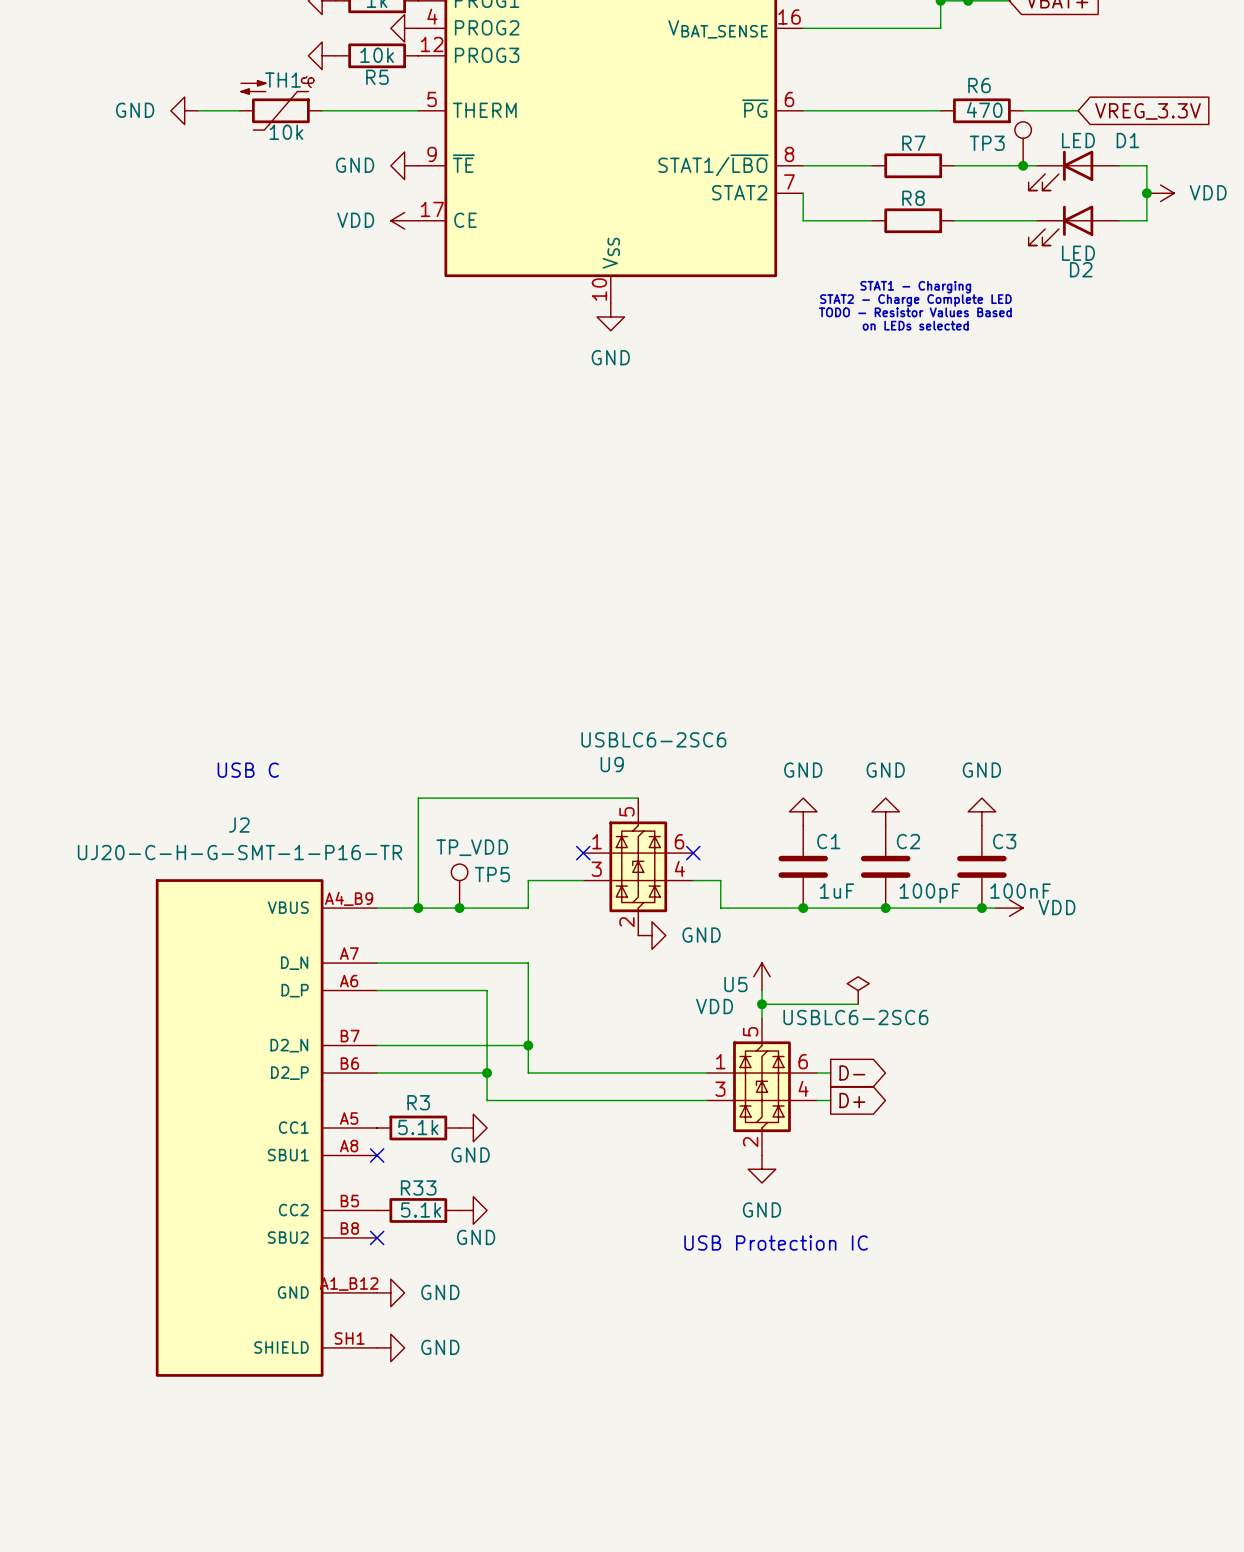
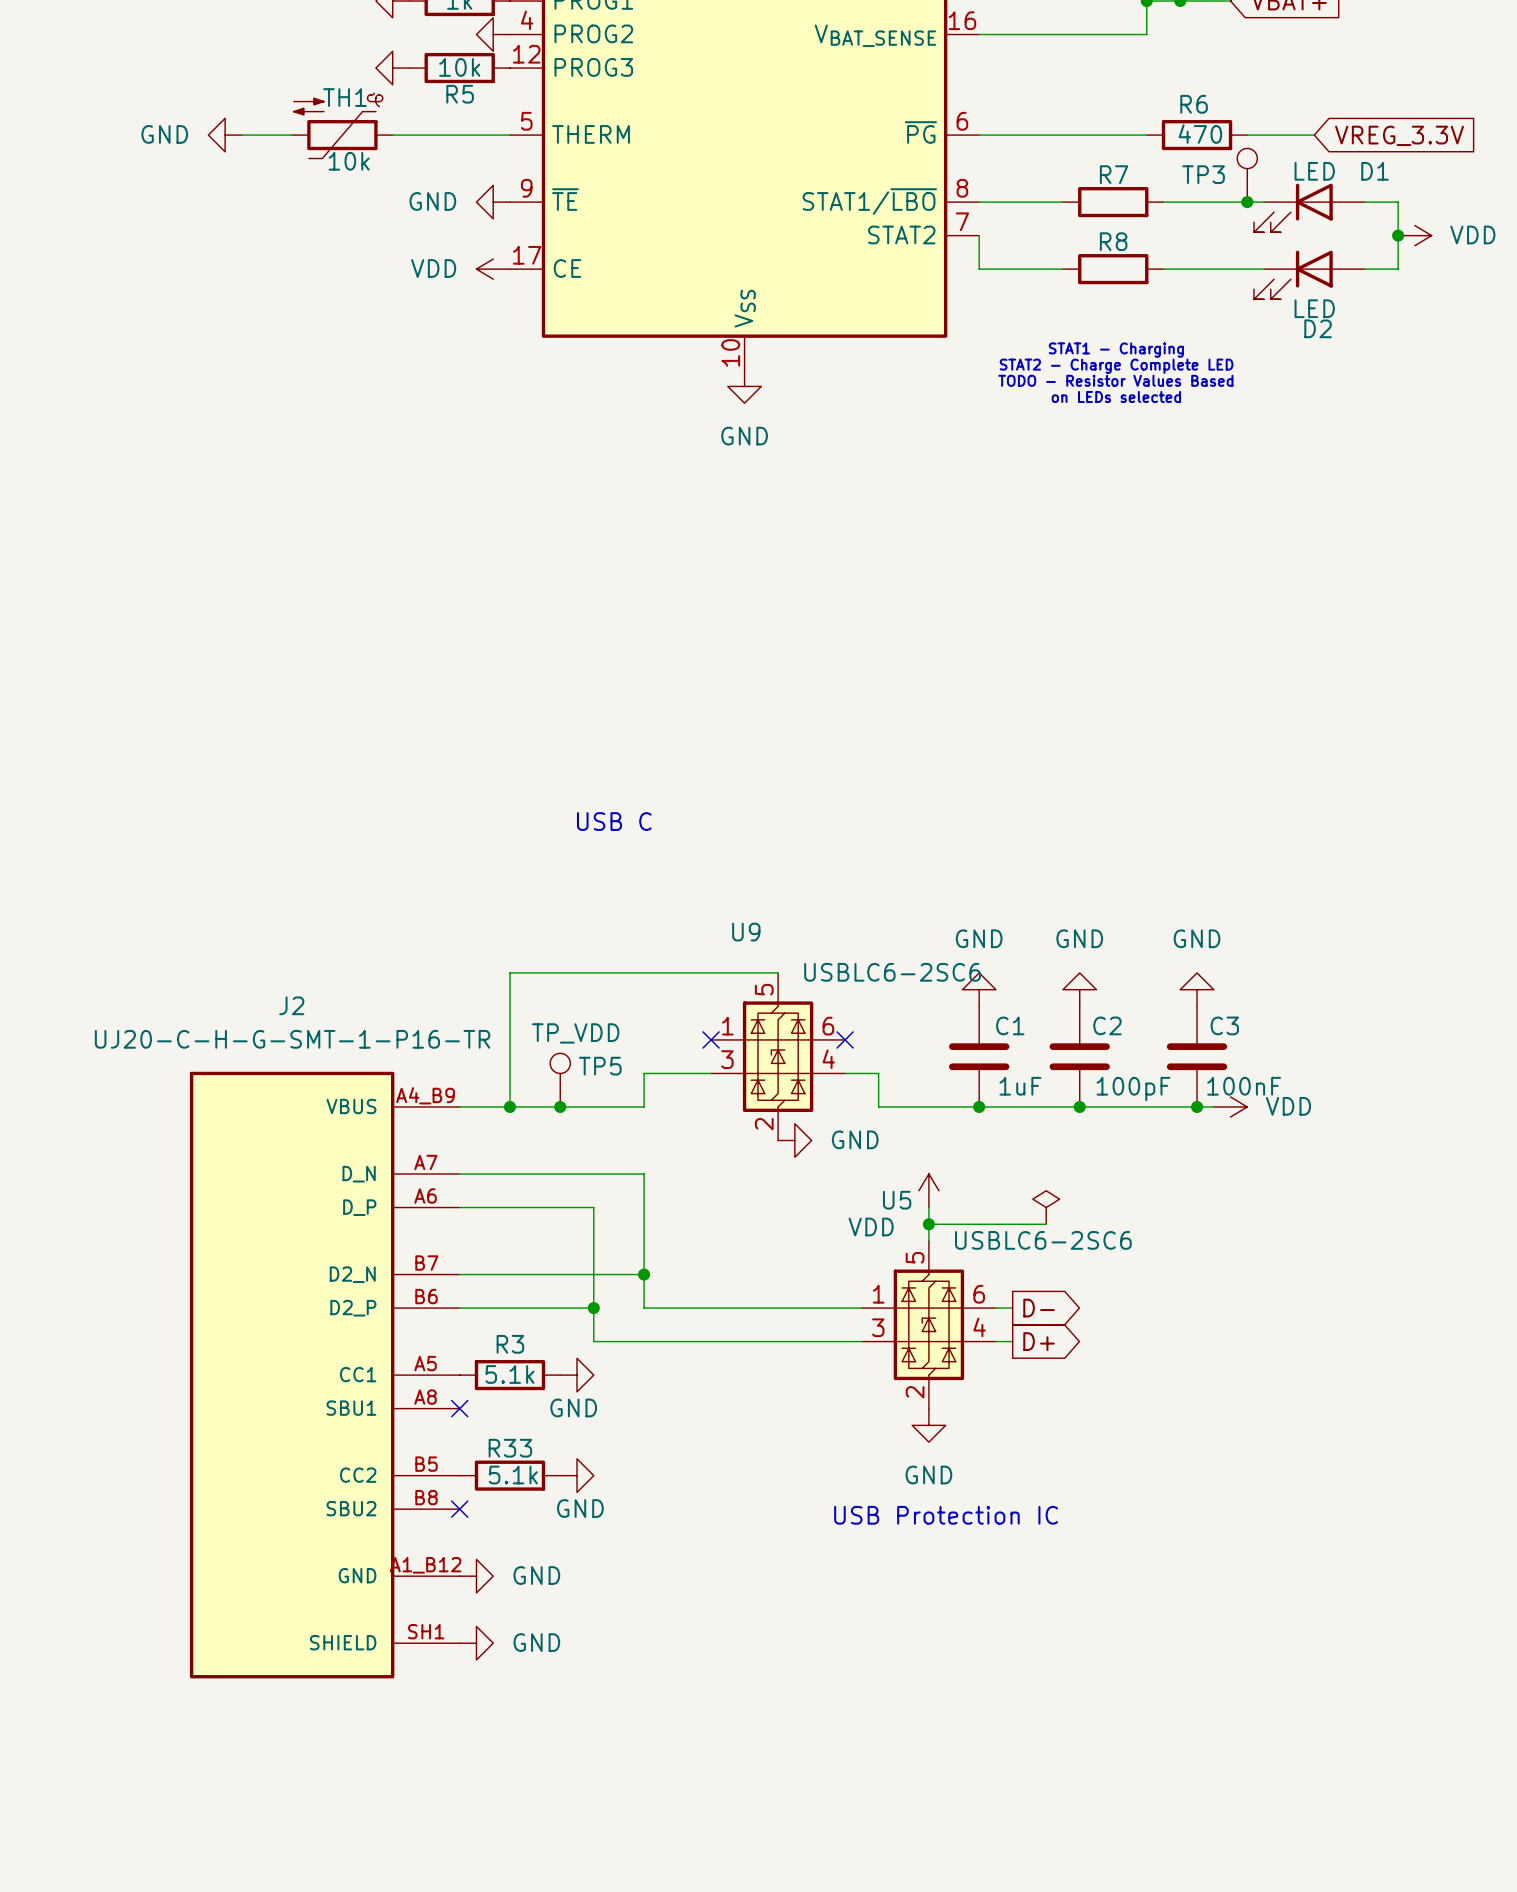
text: none -> USB C (614, 821)
U9 value position: USBLC6-2SC6 (653, 739) -> USBLC6-2SC6 (892, 972)
text: USB C (248, 770) -> none

